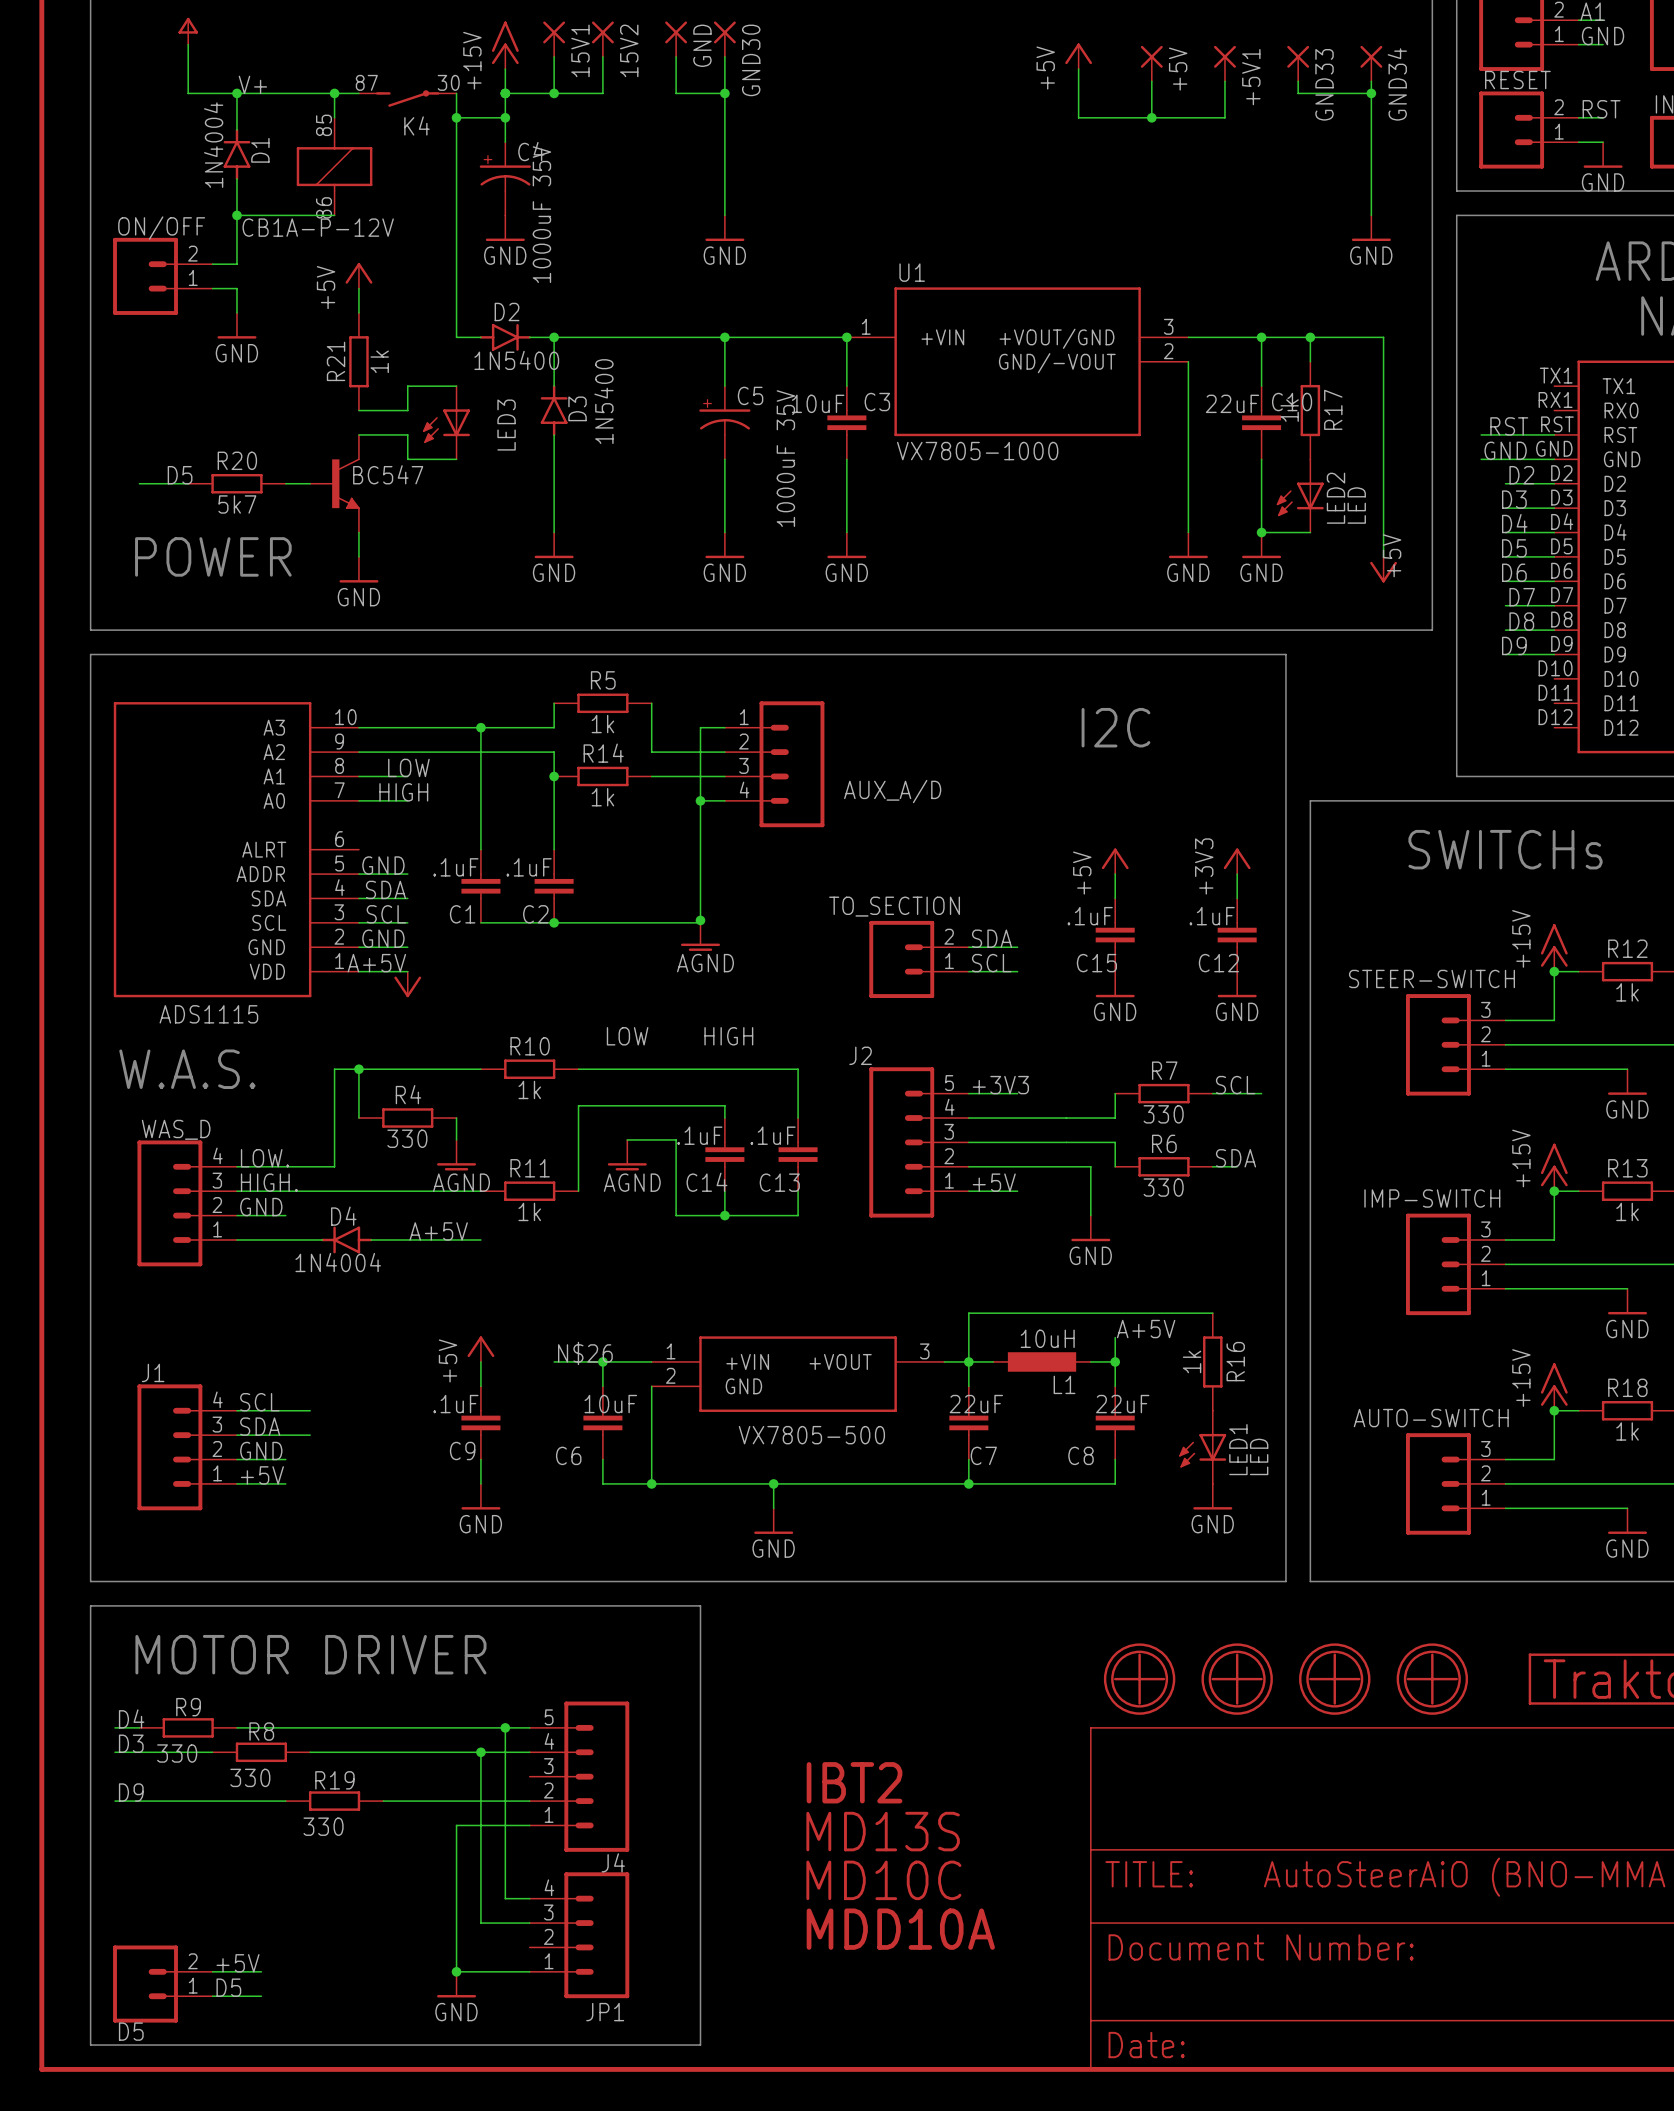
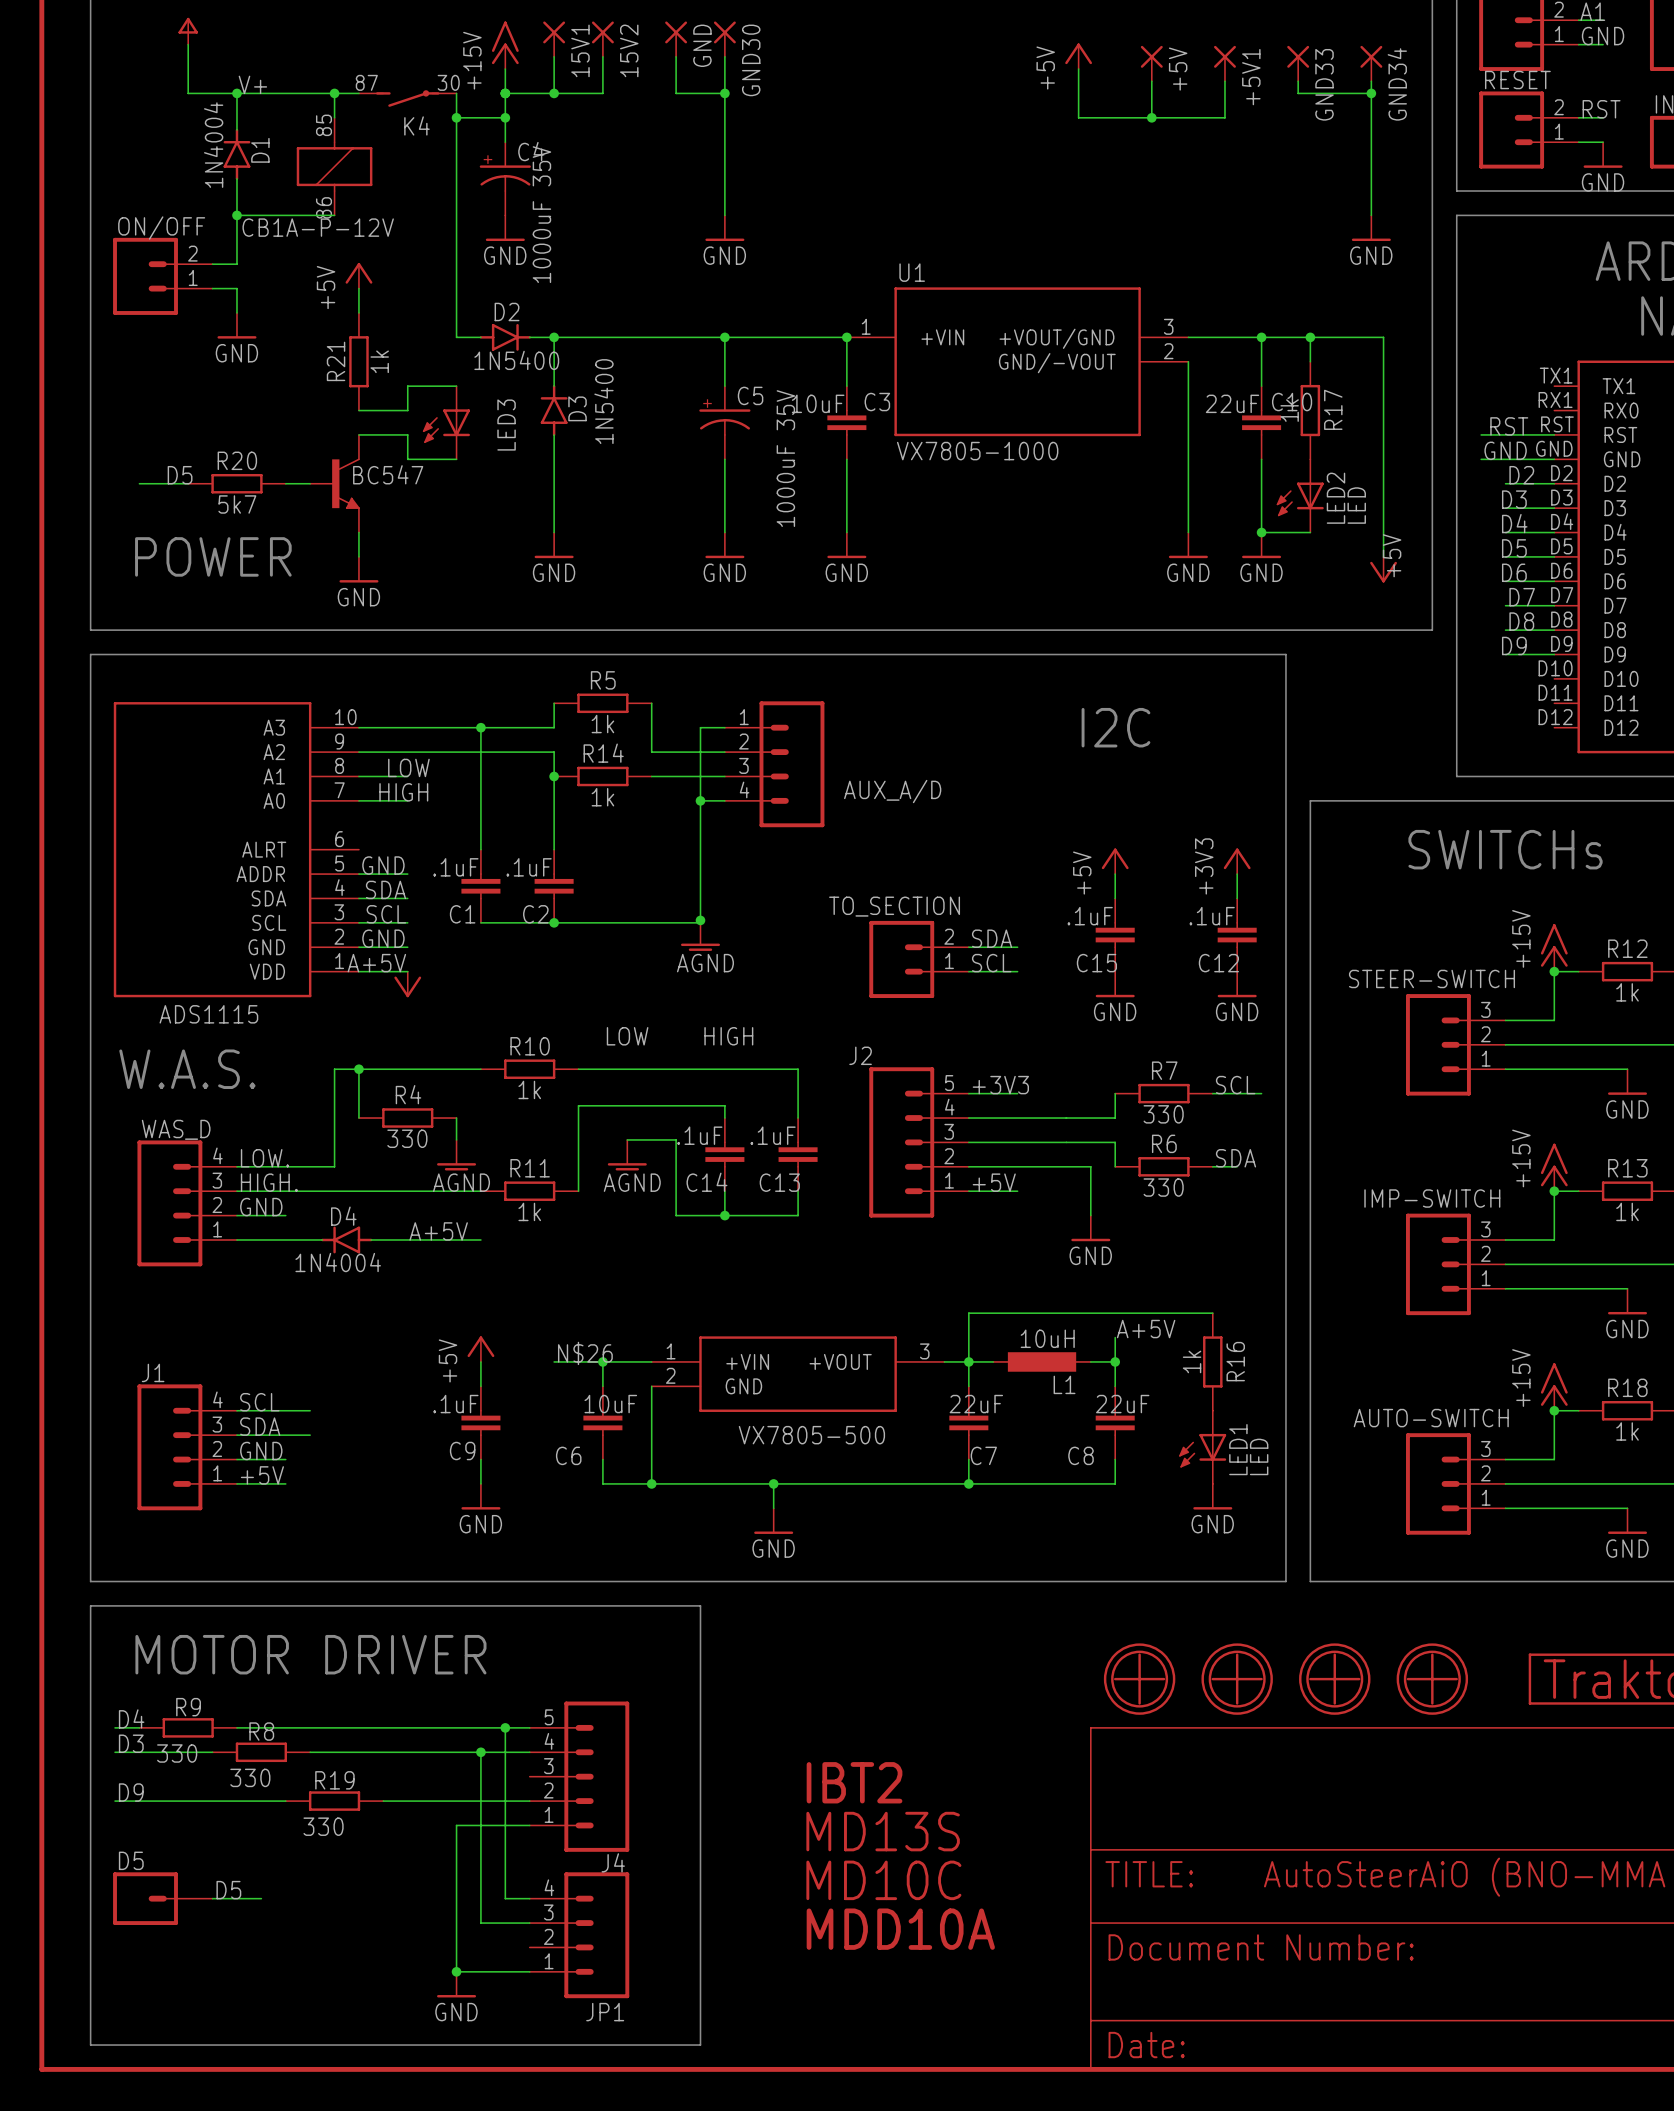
D5 symbol: [113, 1945, 213, 2023] -> [113, 1872, 213, 1926]
label: +5V (238, 1963) -> none
wire: (212, 1971) (261, 1971) -> (212, 1898) (261, 1898)
label position: D5 (228, 1987) -> D5 (228, 1890)
wire: (212, 1996) (261, 1996) -> none
D5 name position: D5 (131, 2031) -> D5 (131, 1860)

